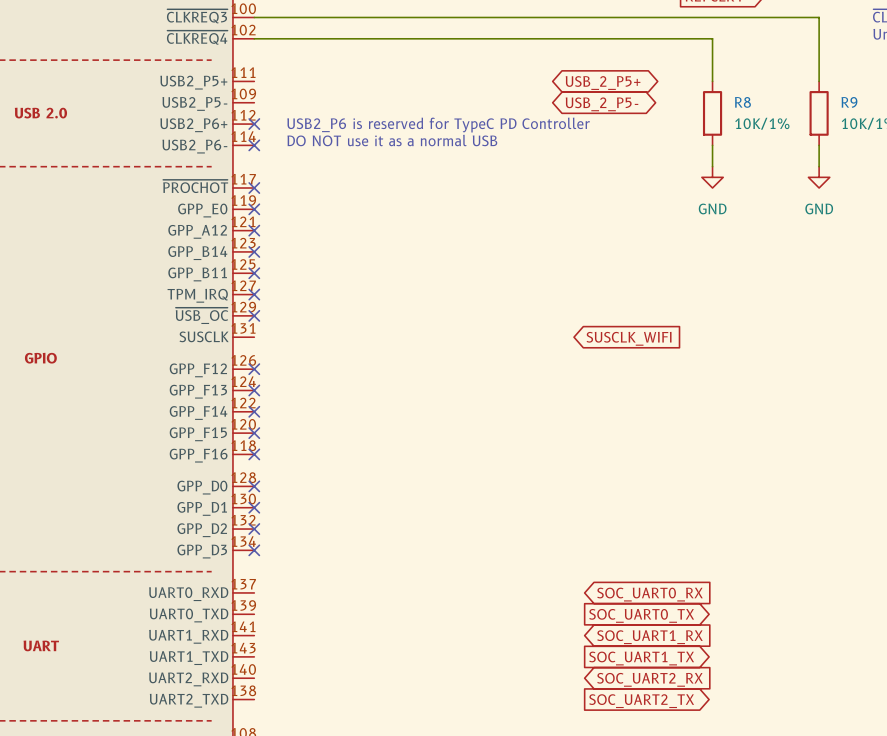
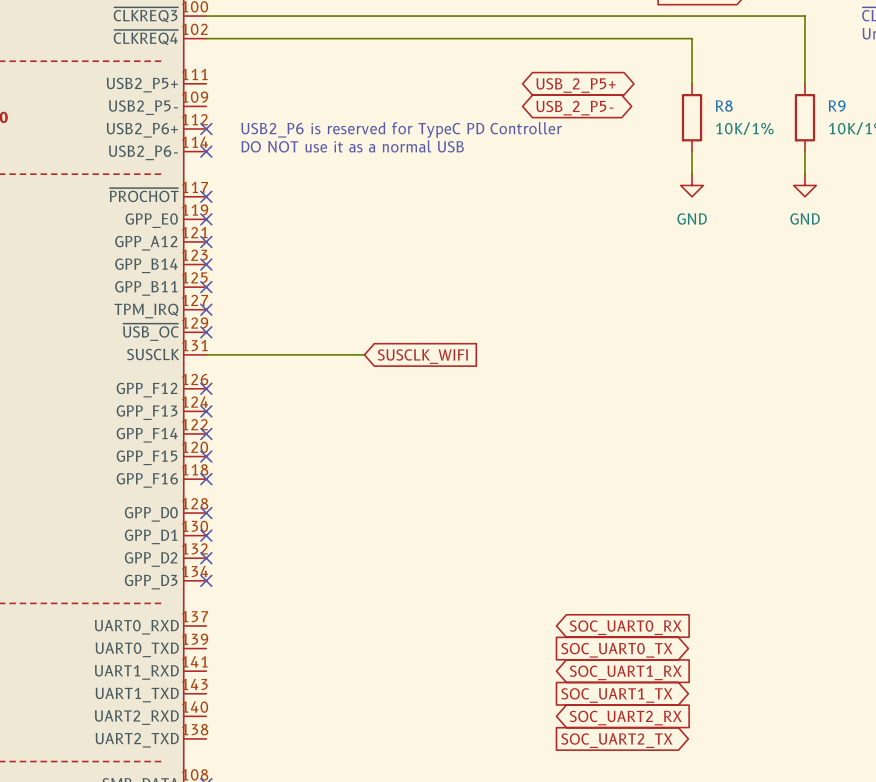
wire: none -> (206, 354) (364, 354)
global label position: SUSCLK_WIFI (629, 338) -> SUSCLK_WIFI (422, 356)

